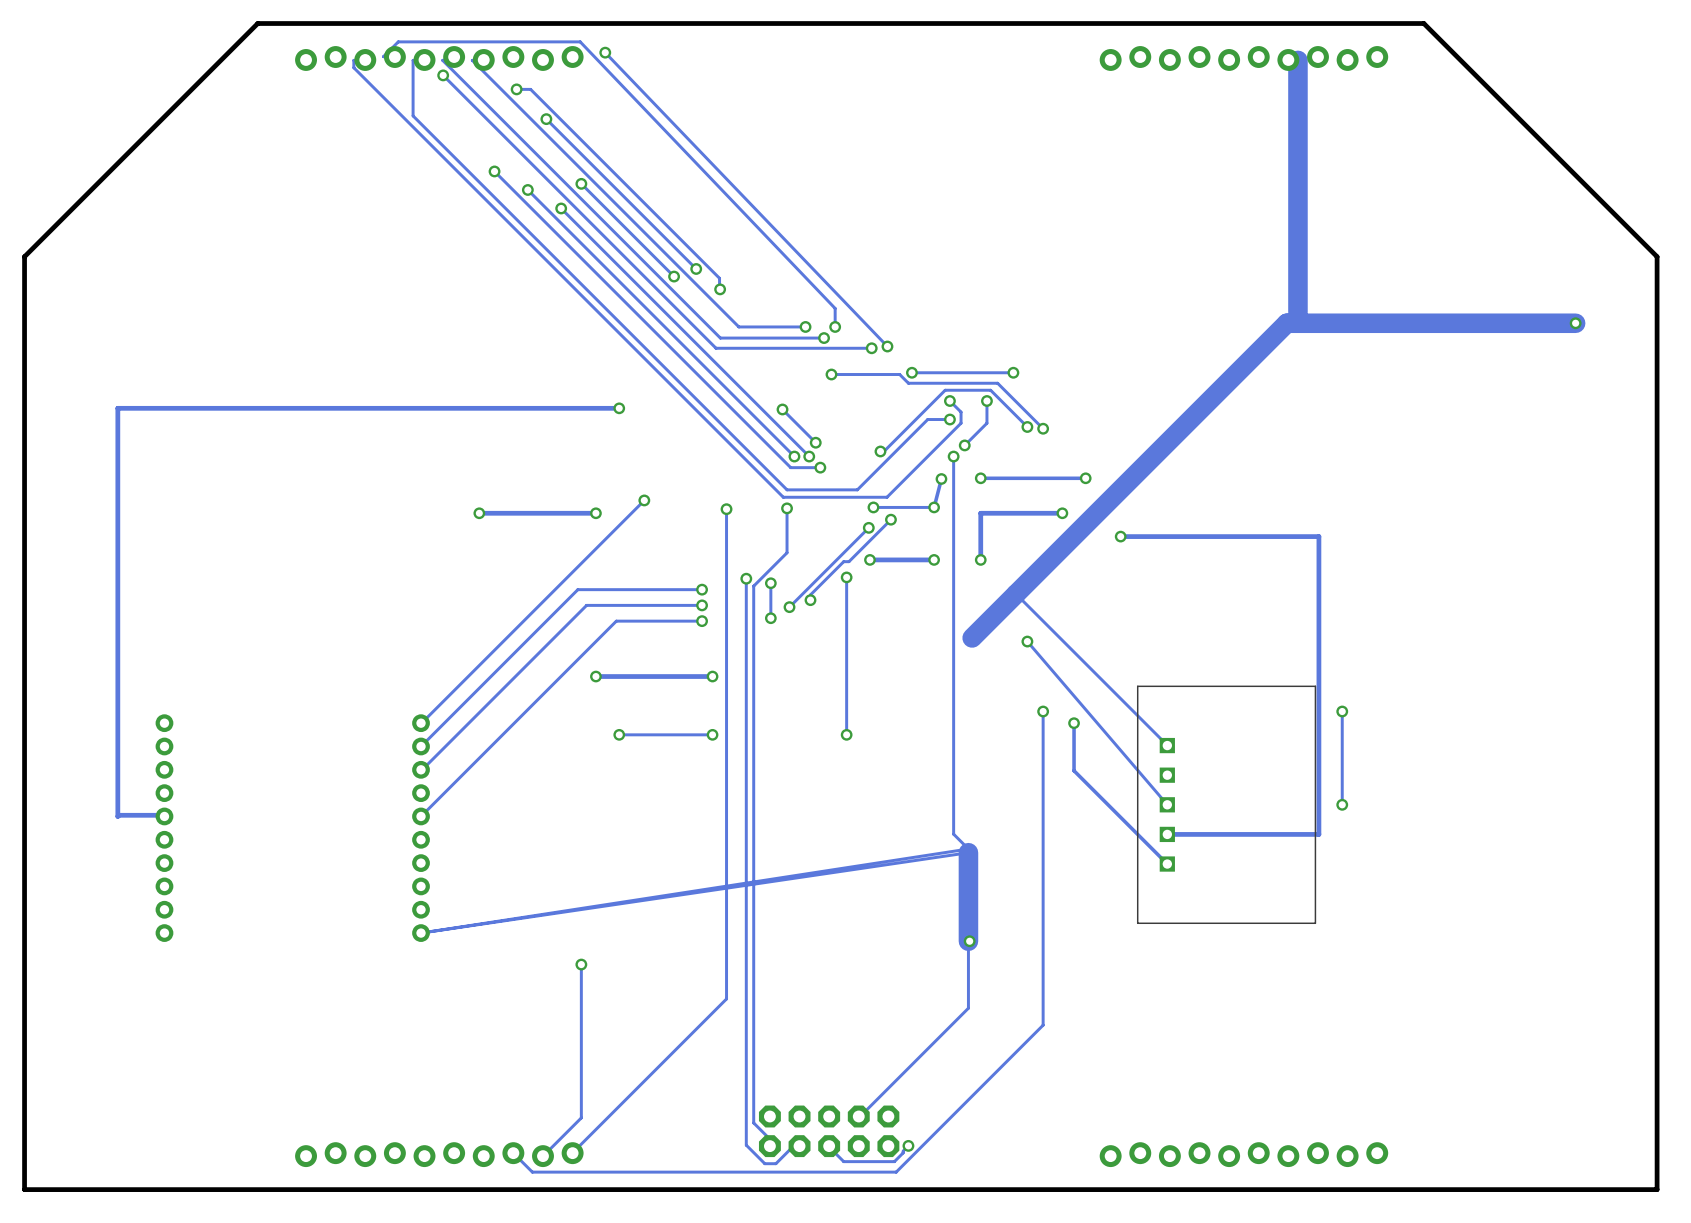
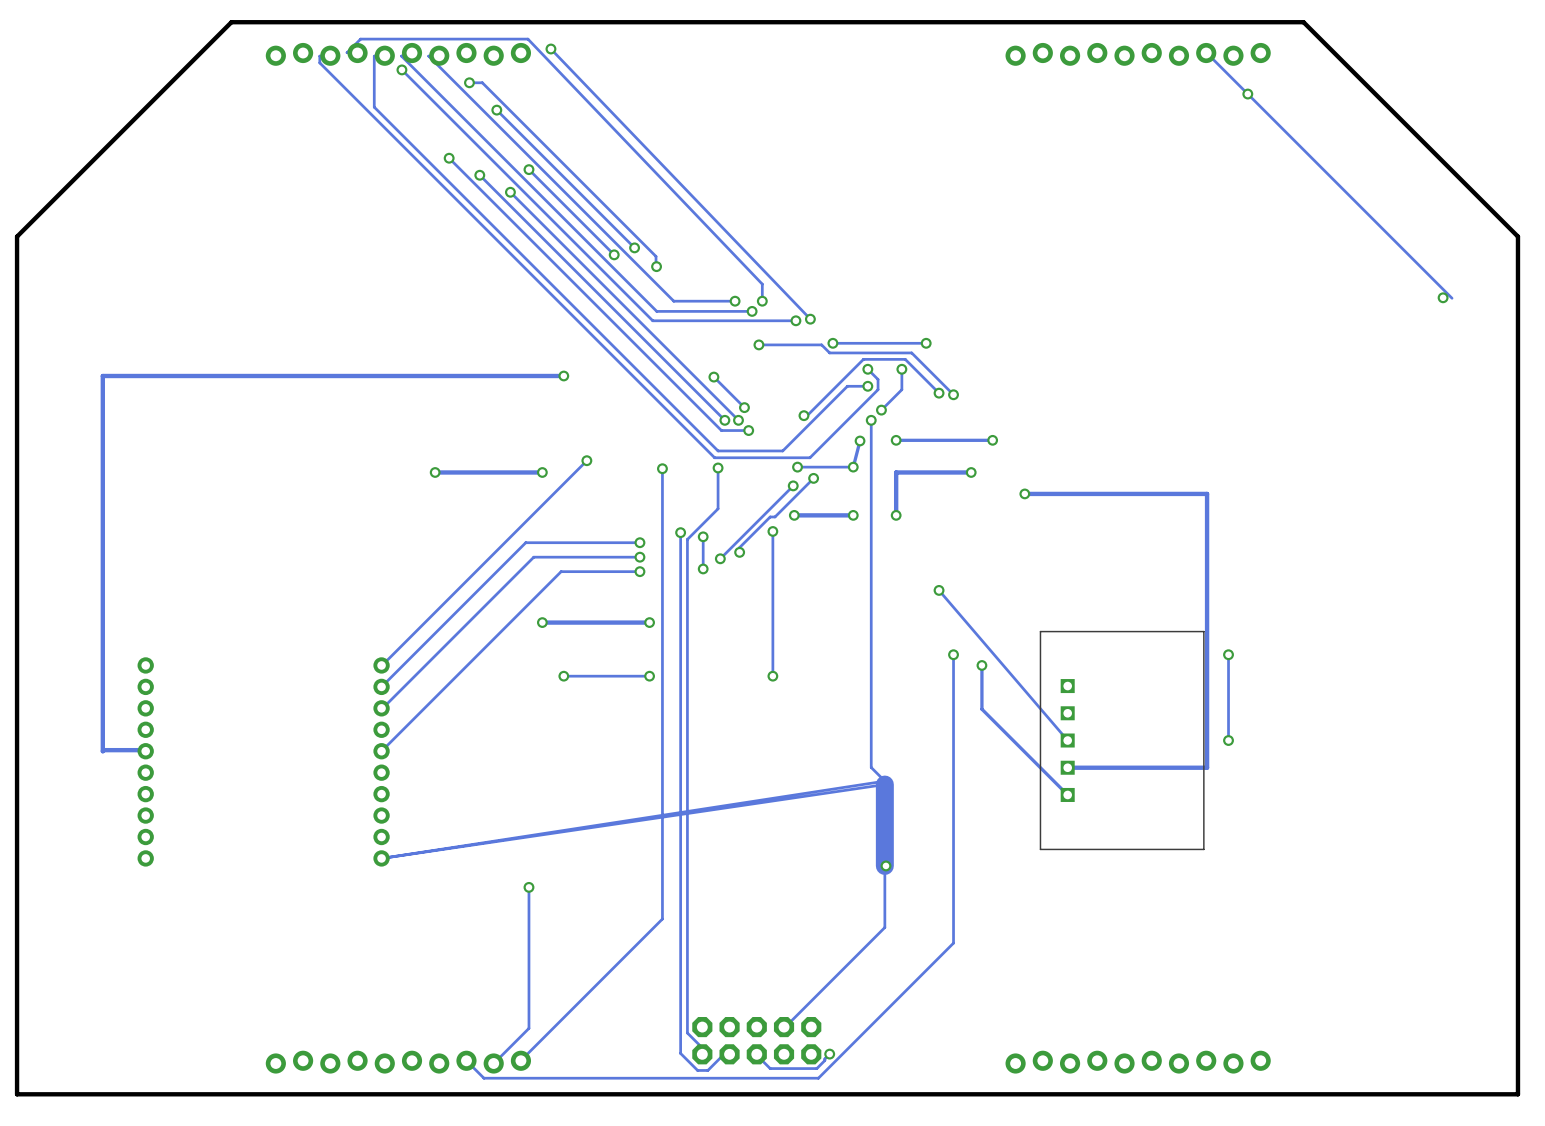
track: none -> (1206, 53) (1452, 298)
track: (1288, 59) (1297, 60) (1297, 312) (1286, 323) -> none
via: none -> (1247, 94)
track: (1286, 323) (972, 637) -> none
track: (1575, 323) (1286, 323) -> none
track: (1016, 594) (1167, 745) -> none

